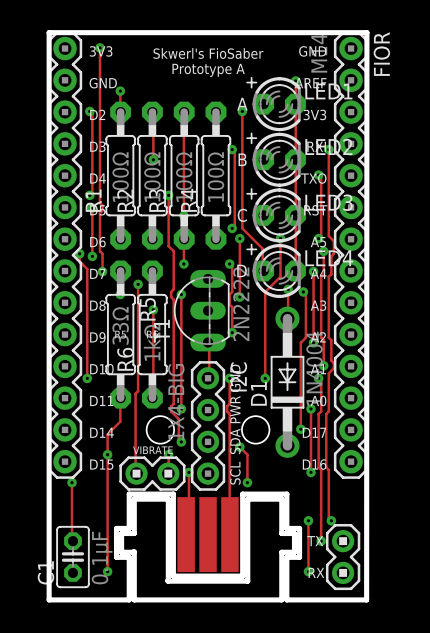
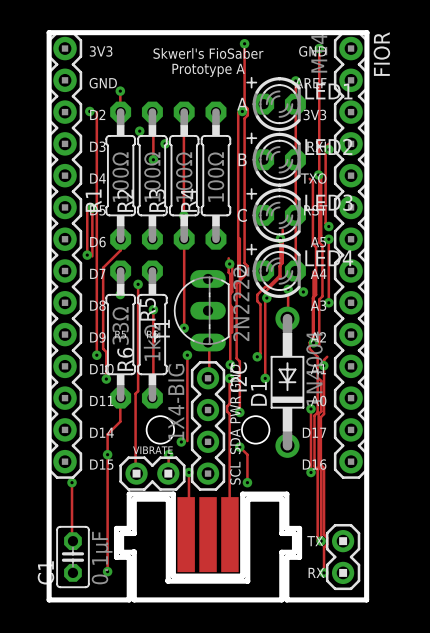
track: none -> (244, 43) (244, 105) (247, 108) (247, 115) (244, 118) (244, 263) (247, 266) (247, 272) (236, 283) (236, 358) (239, 361) (239, 412)
via: none -> (244, 43)
track: (99, 47) (99, 202) (102, 205) (102, 210) (99, 213) (99, 251) (102, 253) (102, 271) -> none
via: (99, 47) -> none
track: none -> (319, 48) (319, 242) (322, 245) (322, 296) (319, 299) (319, 345)
via: none -> (319, 48)
track: (89, 111) (92, 114) (92, 192) (89, 195) -> none
track: (242, 111) (242, 228) (262, 248) (263, 271) -> none
track: none -> (96, 112) (96, 355)
track: none -> (238, 112) (238, 269)
via: none -> (139, 131)
via: none -> (165, 143)
track: none -> (328, 143) (325, 147) (325, 223) (328, 226)
track: (232, 149) (234, 152) (234, 225) (232, 228) -> none
via: (232, 149) -> none
track: (328, 149) (328, 236) (333, 241) (331, 274) (328, 276) -> (328, 239) (328, 276)
track: none -> (309, 178) (312, 182) (312, 243) (316, 247) (316, 294) (312, 298) (312, 339) (309, 342) (309, 348) (317, 356) (317, 412) (314, 415) (314, 466) (317, 469) (317, 541)
via: (89, 195) -> none
track: (168, 195) (168, 246) (173, 251) (173, 289) (171, 291) (171, 297) (173, 299) (173, 403) (171, 406) (171, 411) (178, 419) (178, 439) (181, 441) -> none
via: (168, 195) -> none
track: none -> (87, 207) (87, 255)
via: none -> (328, 226)
via: (232, 228) -> none
track: none -> (282, 229) (282, 263) (279, 266) (279, 275) (257, 294) (257, 301) (260, 304) (260, 353) (257, 356)
via: (239, 238) -> none
via: (318, 238) -> none
track: none -> (120, 239) (120, 250) (103, 267) (103, 348) (106, 352) (106, 379)
track: (184, 239) (183, 264) -> (184, 239) (184, 328)
via: none -> (328, 239)
track: (323, 251) (323, 274) (321, 276) (321, 337) (323, 340) (323, 365) -> none
via: (323, 251) -> none
track: (79, 253) (79, 261) (87, 269) (87, 378) -> none
via: (79, 253) -> none
via: none -> (87, 255)
via: (92, 256) -> none
track: none -> (228, 258) (230, 364)
via: (183, 264) -> none
via: (102, 271) -> none
via: (313, 271) -> none
track: (303, 291) (305, 294) (305, 337) (300, 342) (300, 429) -> none
track: (181, 294) (181, 408) -> none
via: (181, 294) -> none
via: (239, 297) -> none
via: none -> (266, 298)
track: (328, 302) (328, 337) (331, 340) (331, 360) (333, 363) (333, 368) (328, 373) (326, 467) (328, 469) (328, 518) (331, 520) -> none
via: none -> (328, 302)
via: none -> (184, 328)
via: (232, 332) -> none
via: none -> (96, 355)
track: none -> (187, 355) (187, 441)
via: none -> (187, 355)
via: none -> (257, 356)
track: none -> (327, 356) (324, 359) (324, 414) (320, 417) (320, 464) (324, 468) (324, 534) (327, 537) (327, 544) (324, 547) (324, 572)
via: none -> (230, 364)
via: (87, 378) -> none
via: (318, 378) -> none
via: none -> (106, 379)
via: (181, 408) -> none
via: none -> (239, 412)
via: (300, 429) -> none
track: (308, 520) (308, 571) -> none
via: (308, 520) -> none
via: (331, 520) -> none
via position: (308, 571) -> (324, 572)

